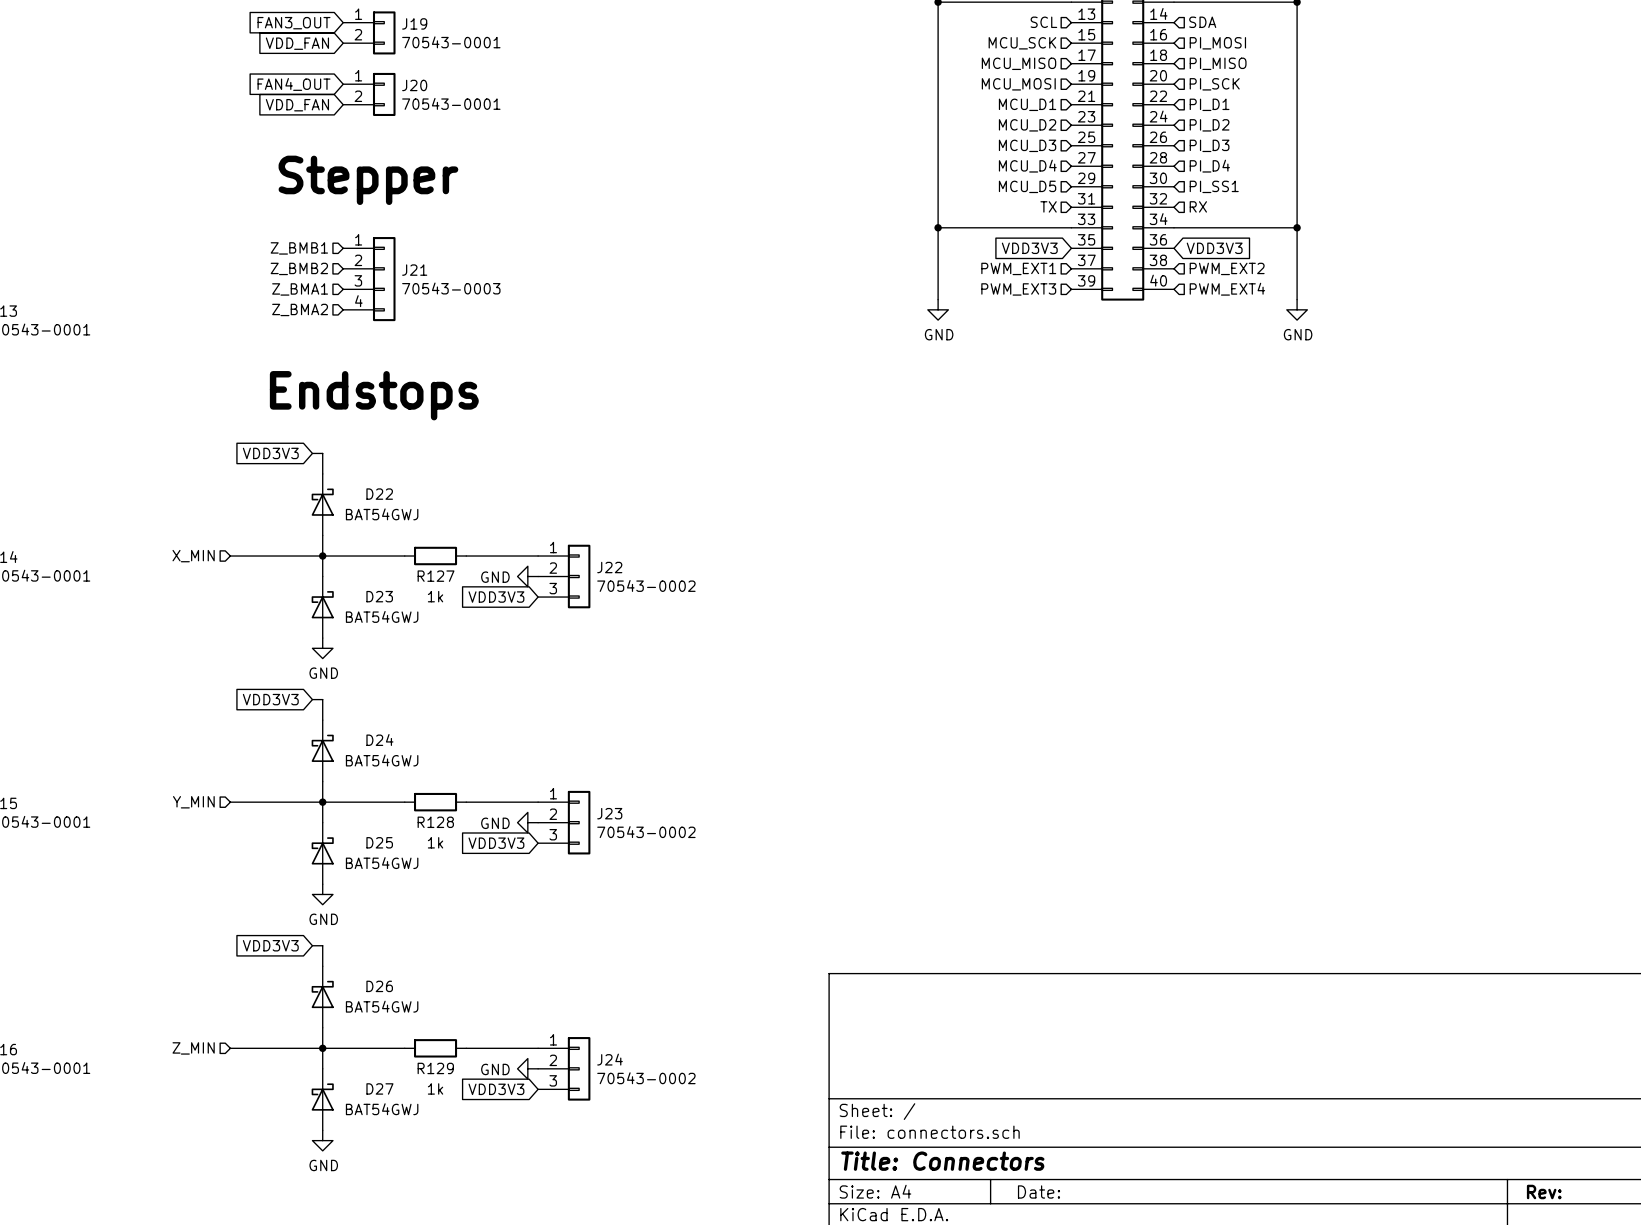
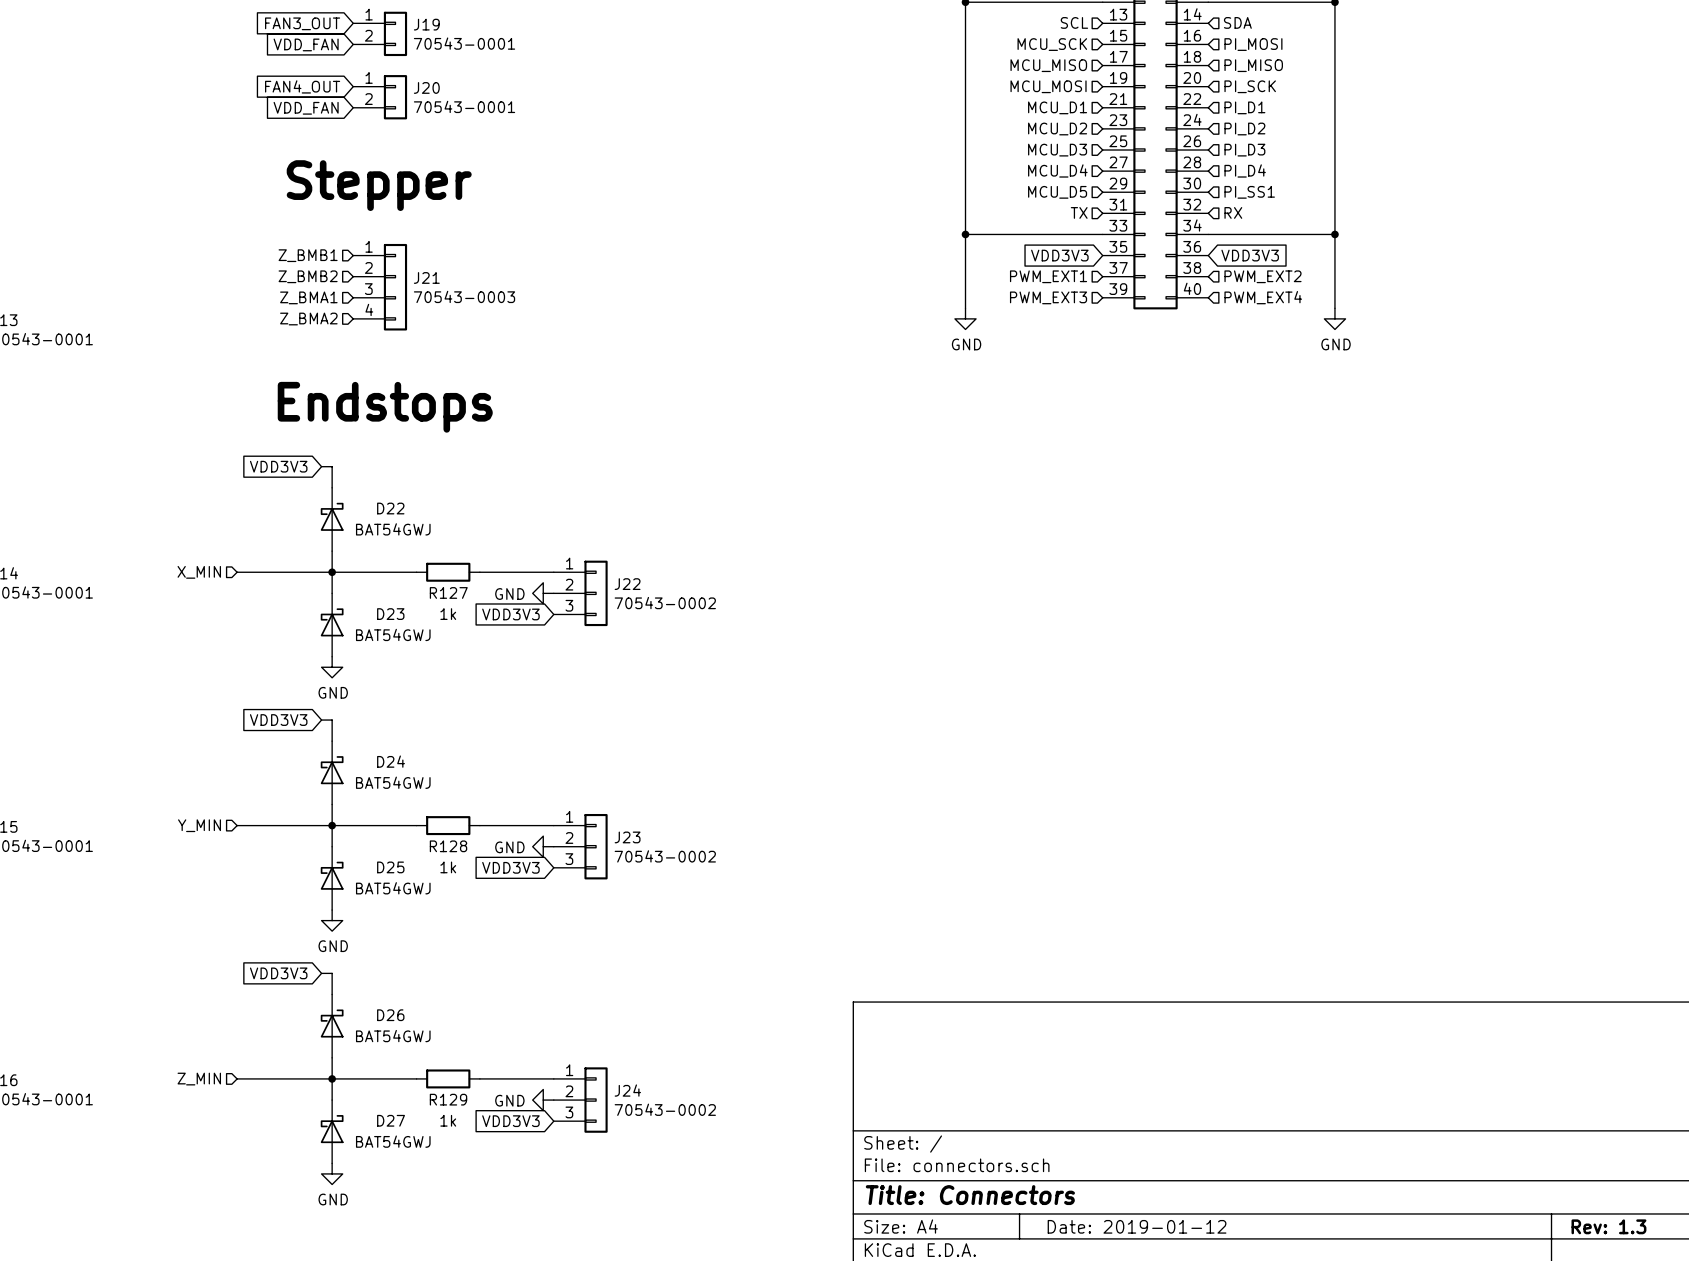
title block: Date: (1039, 1192) -> Date: 2019-01-12 (1137, 1226)
title block: Rev: (1544, 1192) -> Rev: 1.3 (1608, 1226)

